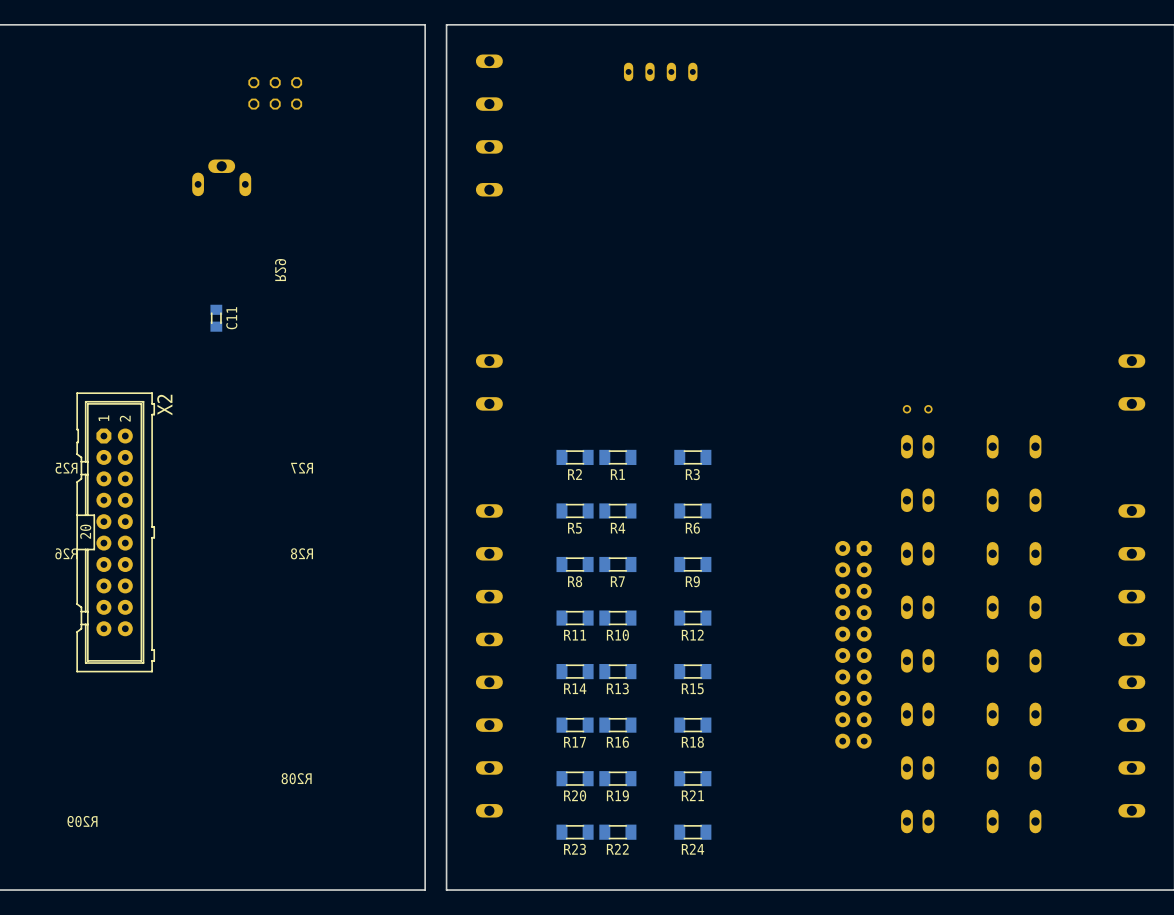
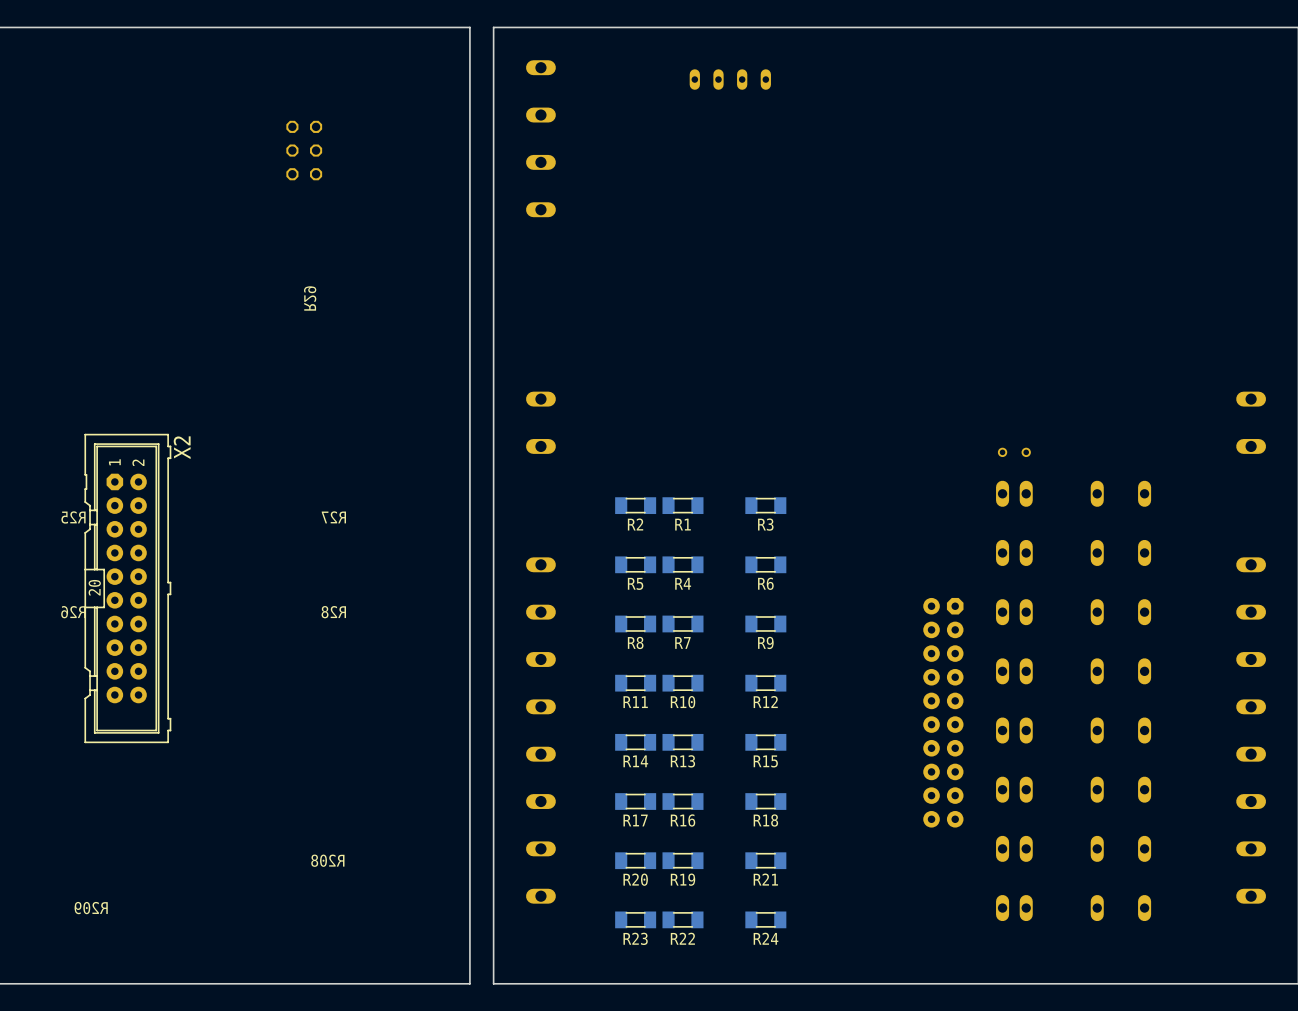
part rotation: 0° (275, 93) -> 90° clockwise (304, 150)
part position: (275, 93) -> (304, 150)
part: (221, 177) -> none
C11: (216, 318) -> none

